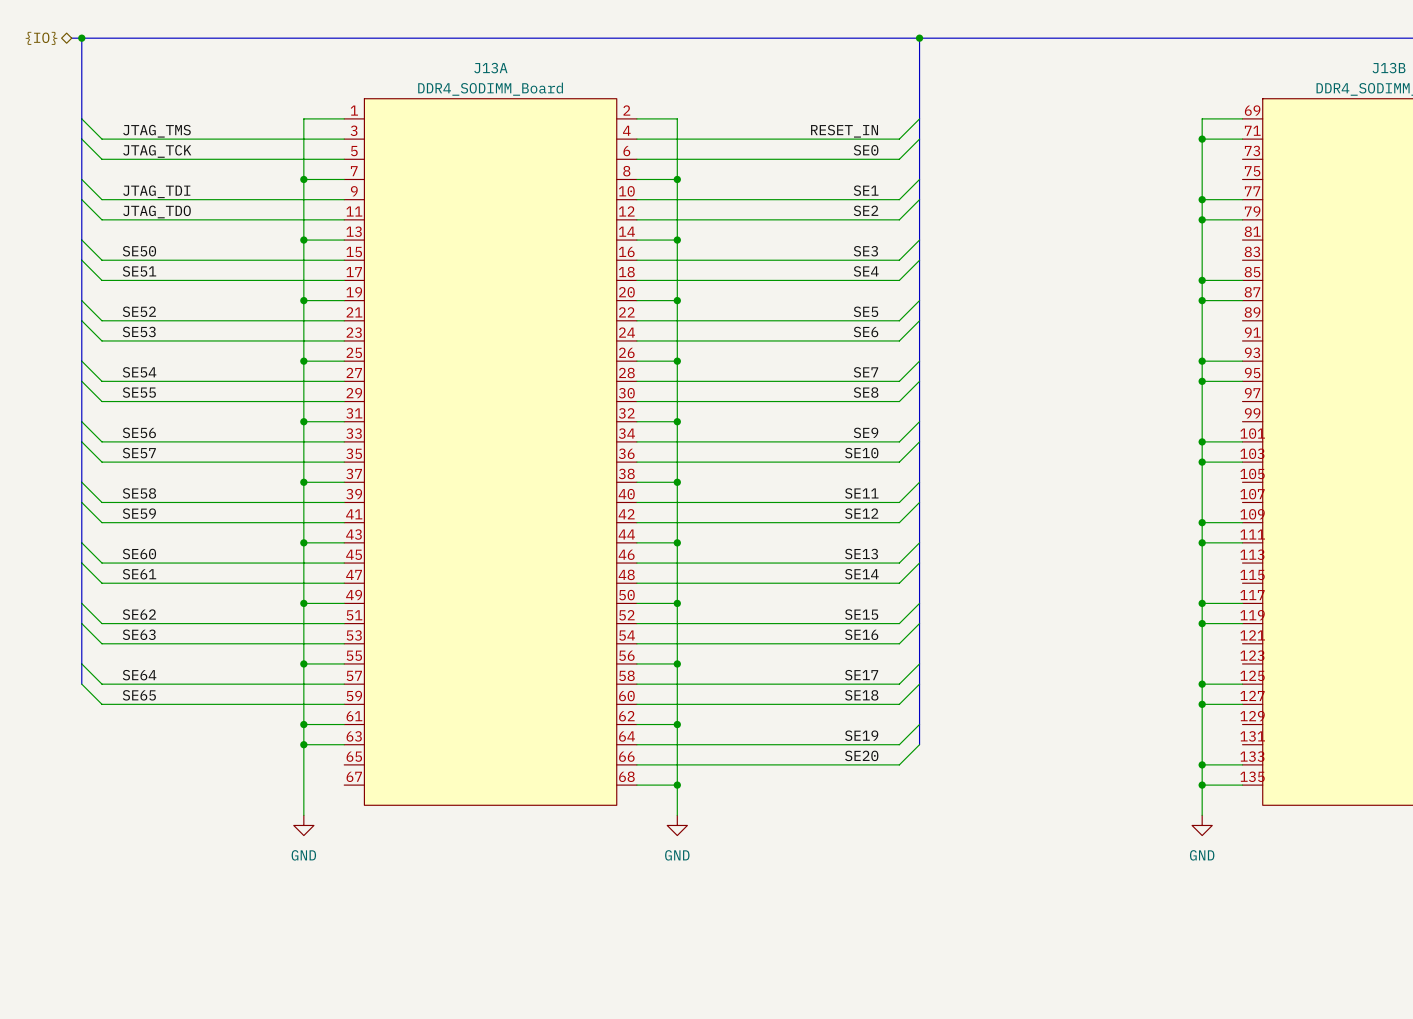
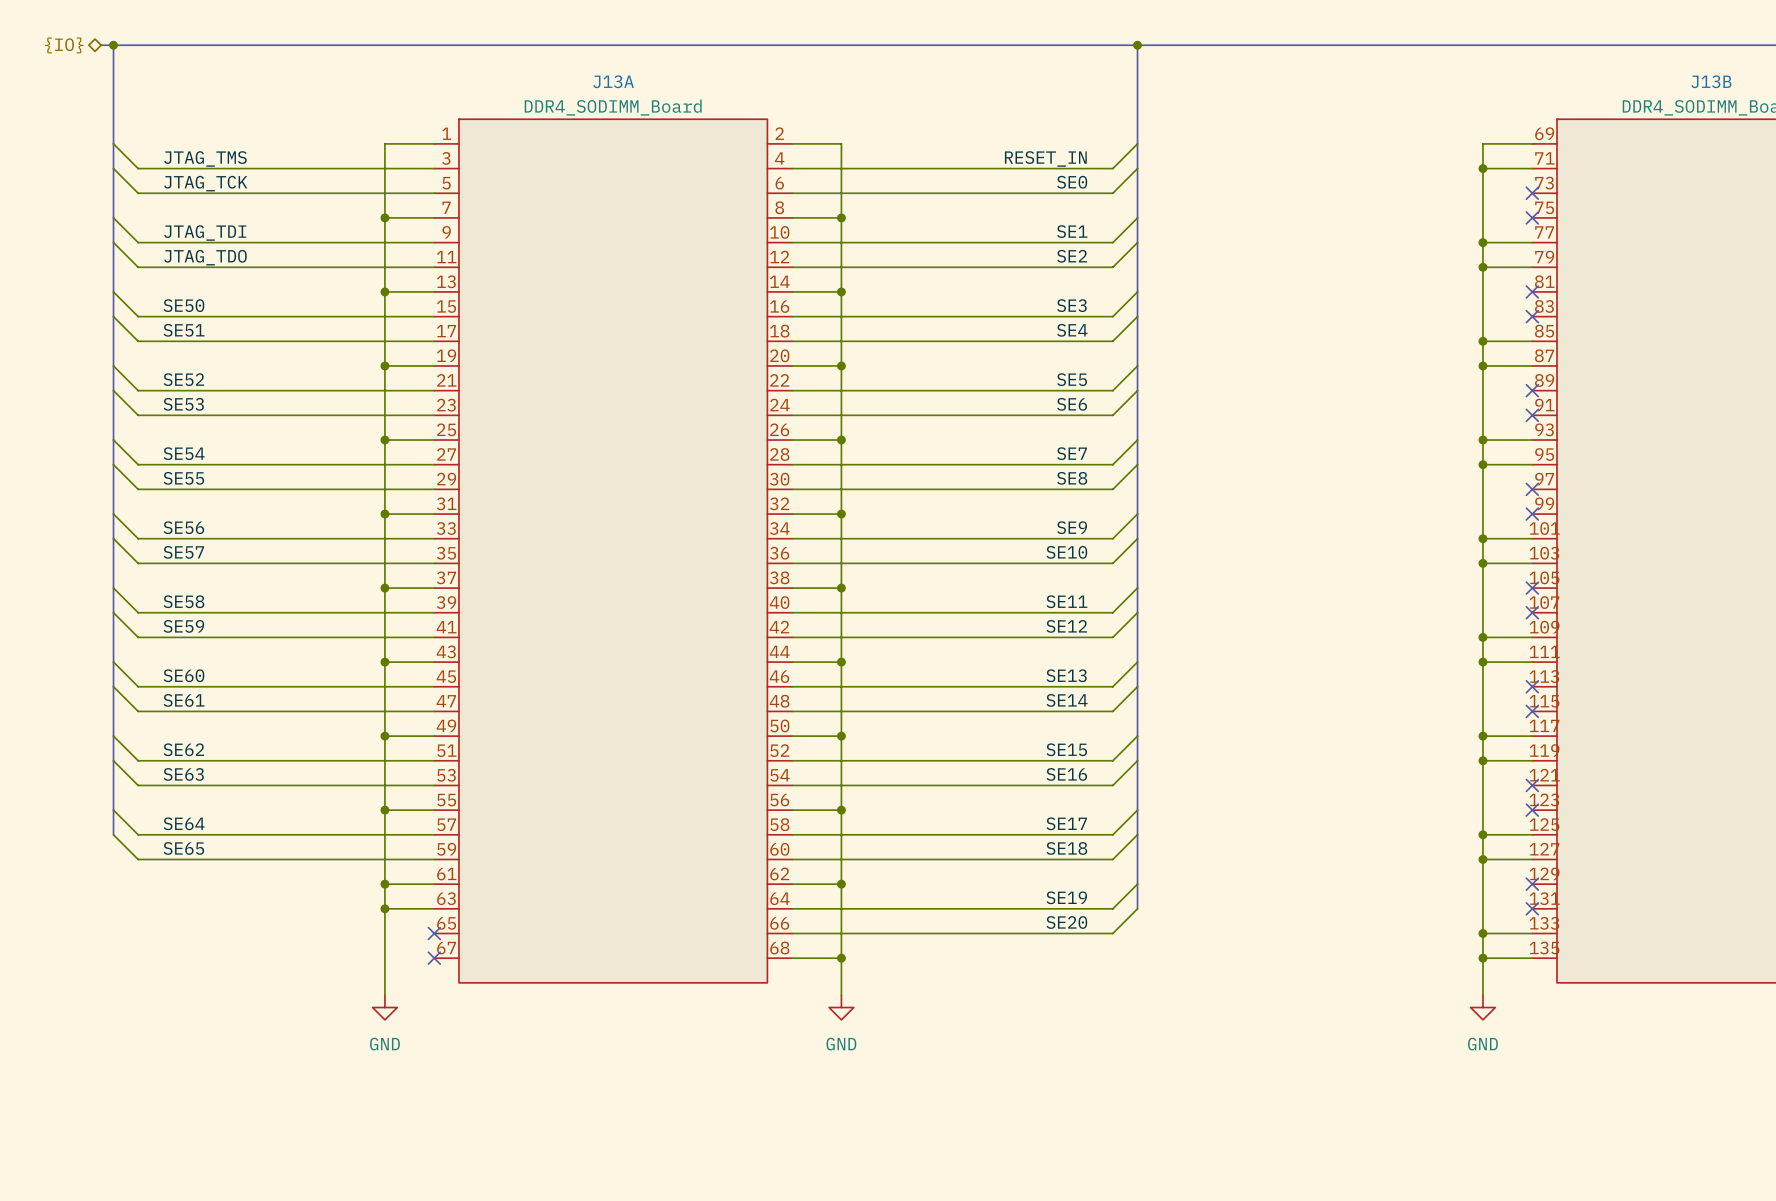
no-connect mark: none -> (1532, 193)
no-connect mark: none -> (1532, 217)
no-connect mark: none -> (1532, 291)
no-connect mark: none -> (1532, 316)
no-connect mark: none -> (1532, 390)
no-connect mark: none -> (1532, 415)
no-connect mark: none -> (1532, 489)
no-connect mark: none -> (1532, 514)
no-connect mark: none -> (1532, 588)
no-connect mark: none -> (1532, 612)
no-connect mark: none -> (1532, 686)
no-connect mark: none -> (1532, 711)
no-connect mark: none -> (1532, 785)
no-connect mark: none -> (1532, 810)
no-connect mark: none -> (1532, 884)
no-connect mark: none -> (1532, 908)
no-connect mark: none -> (434, 933)
no-connect mark: none -> (434, 958)

